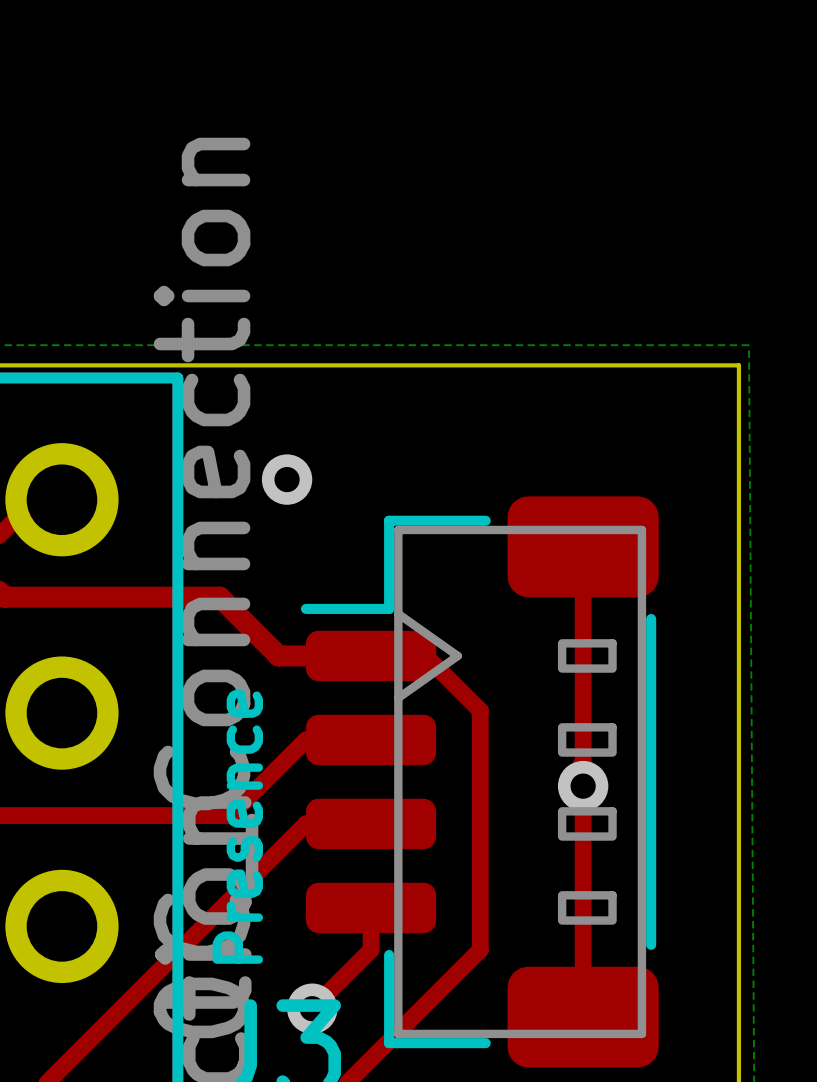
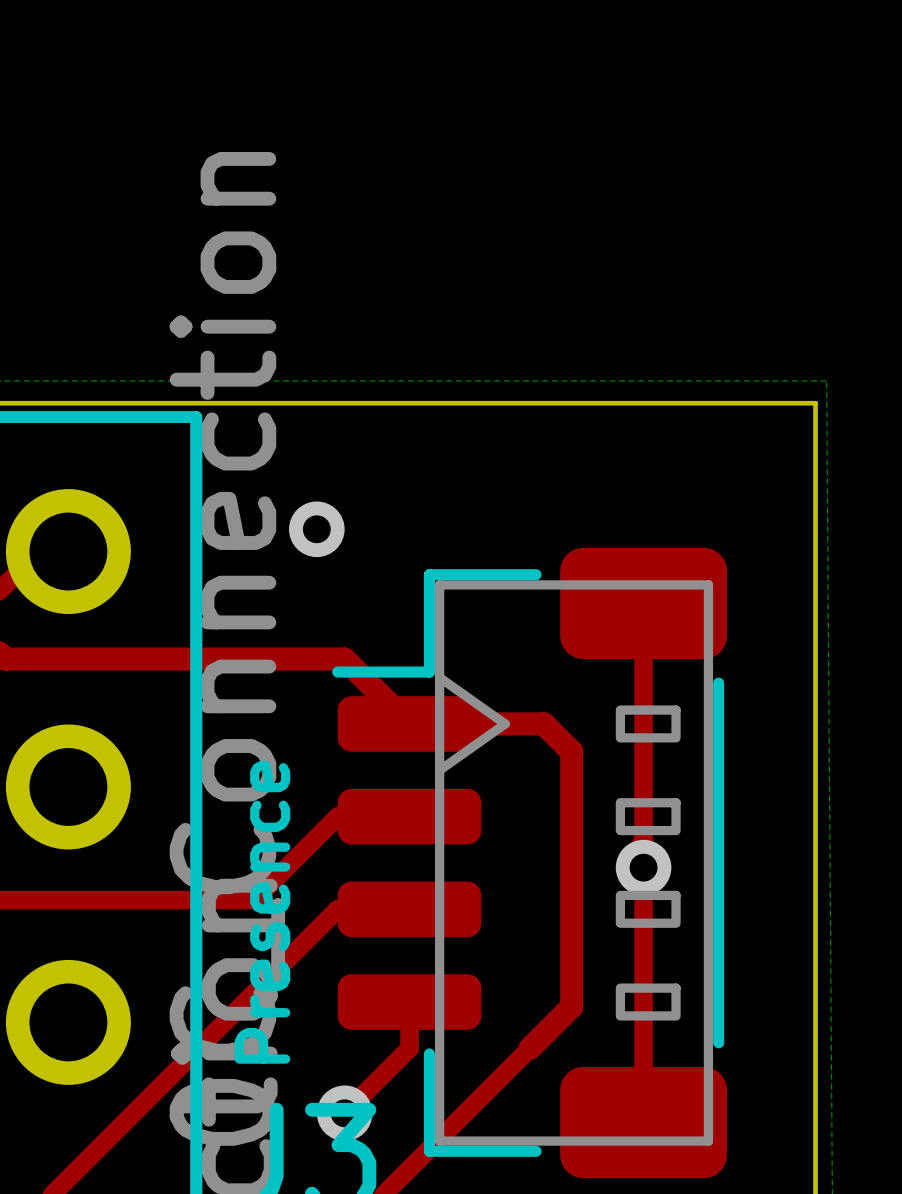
top track: (219, 597) (278, 655) (371, 655) -> (242, 659) (344, 659) (409, 723)
top track: (425, 655) (480, 710) (480, 949) -> (469, 723) (543, 723) (571, 751) (571, 1006) (530, 1048)

